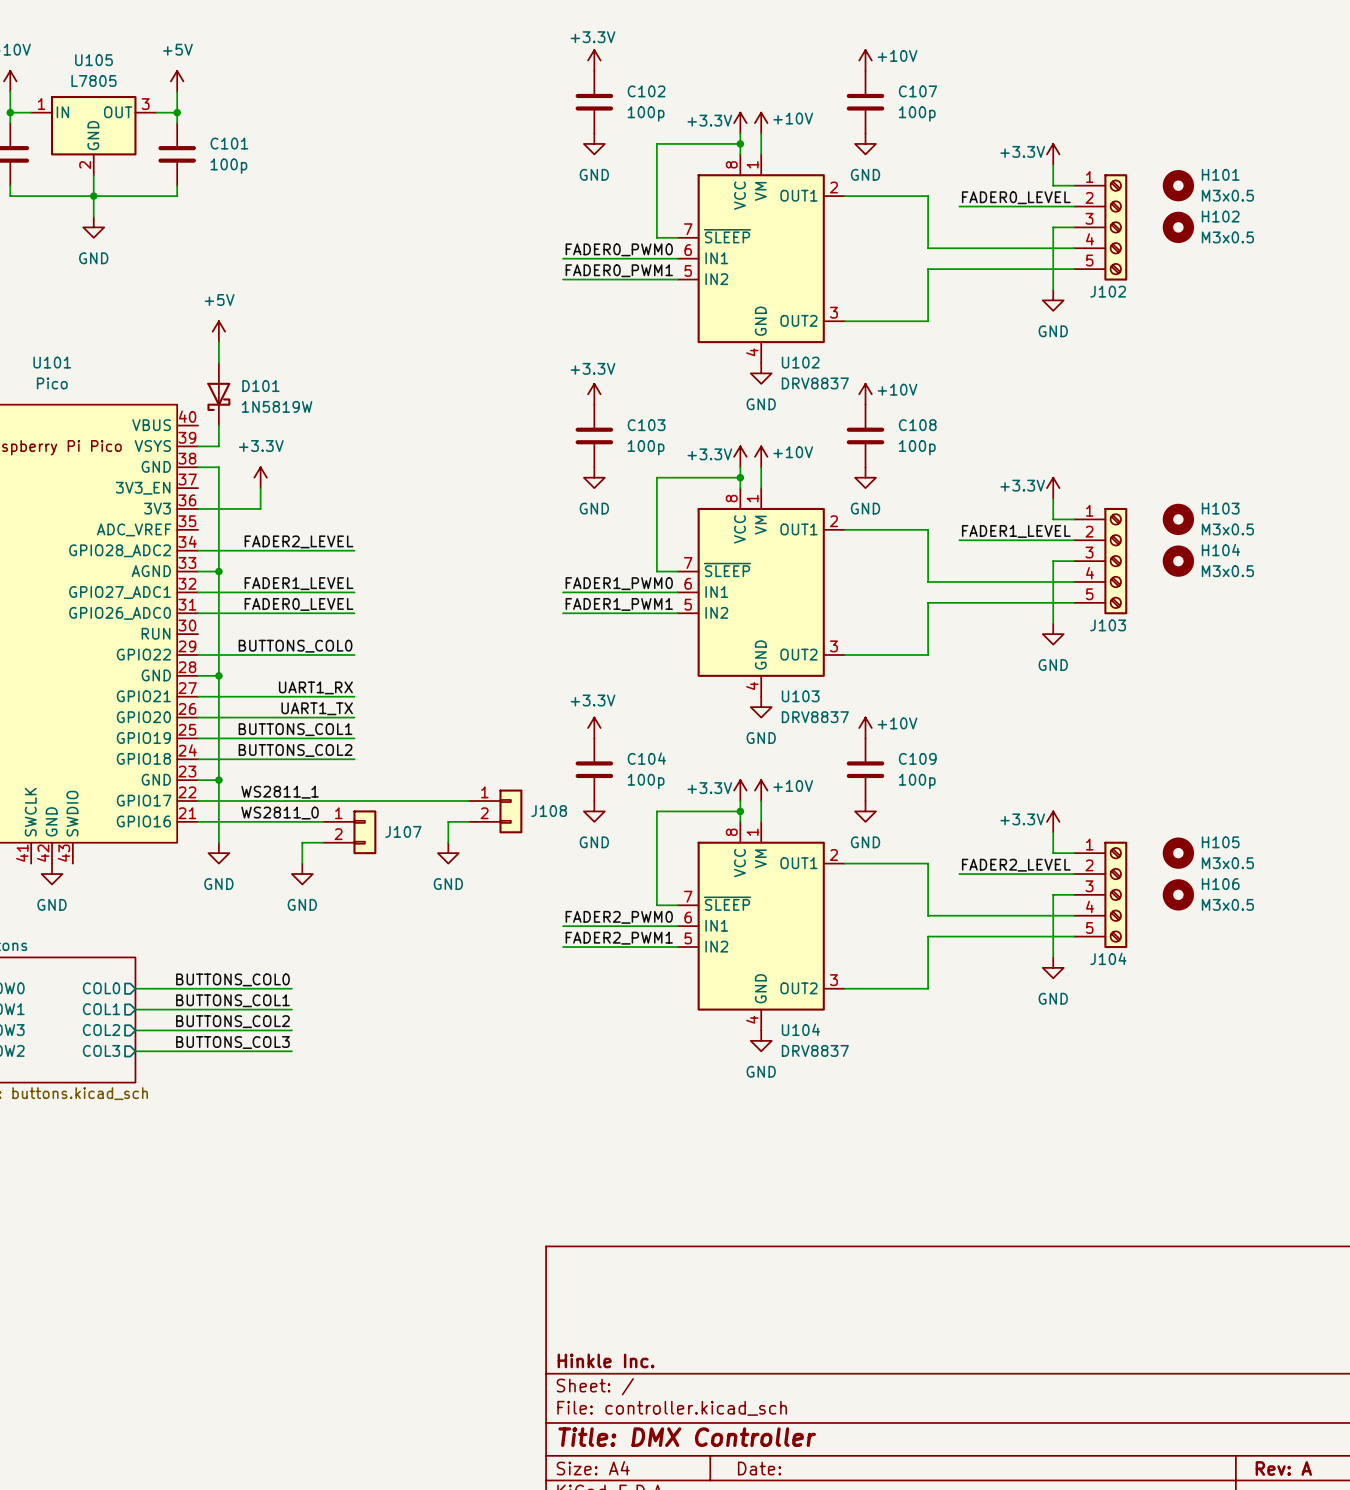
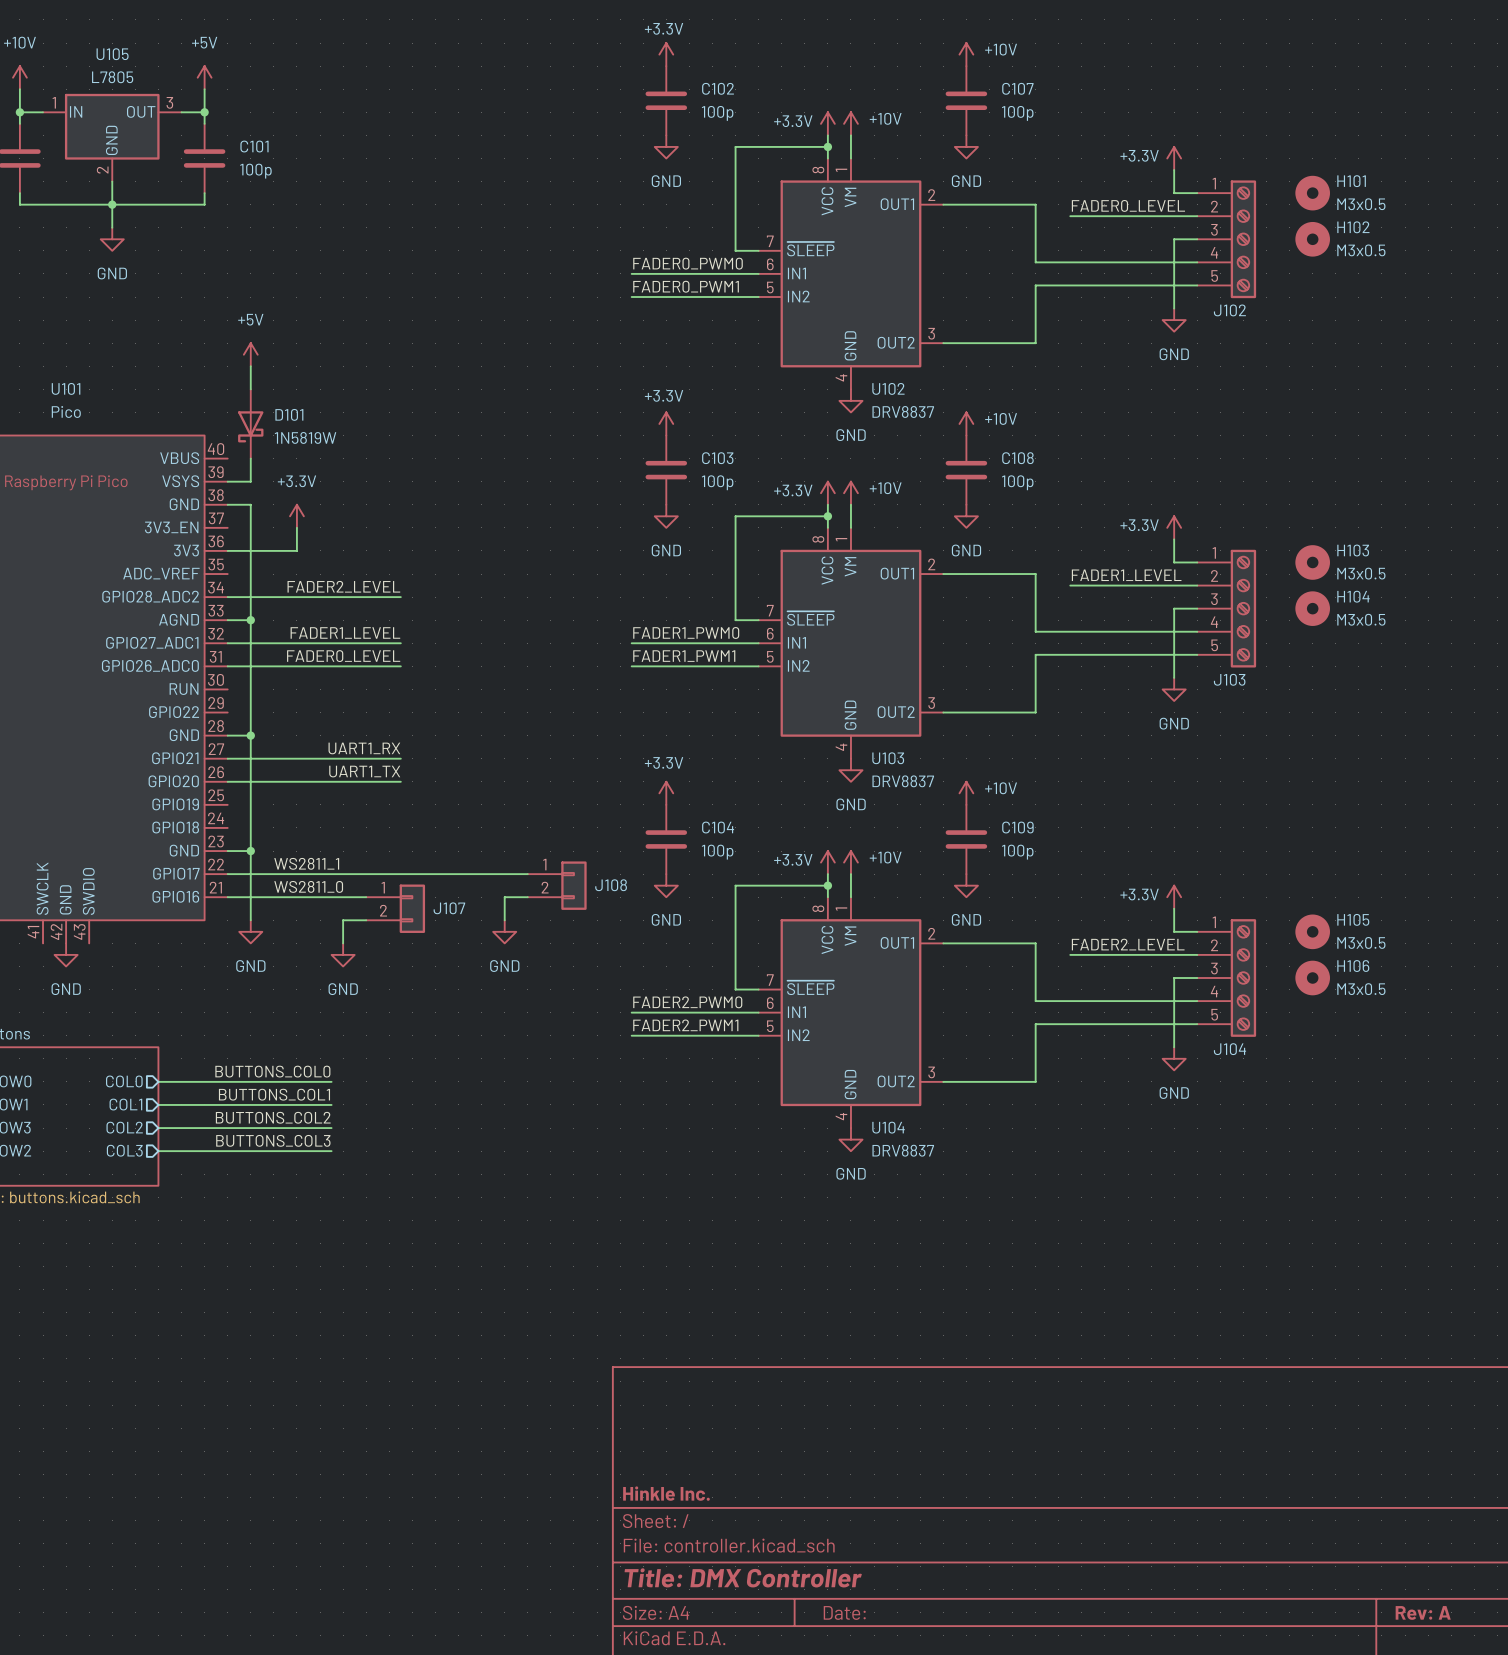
label: BUTTONS_COL0 (295, 646) -> none
wire: (198, 654) (354, 654) -> none
label: BUTTONS_COL1 (295, 729) -> none
wire: (198, 738) (354, 738) -> none
label: BUTTONS_COL2 (295, 750) -> none
wire: (198, 759) (354, 759) -> none

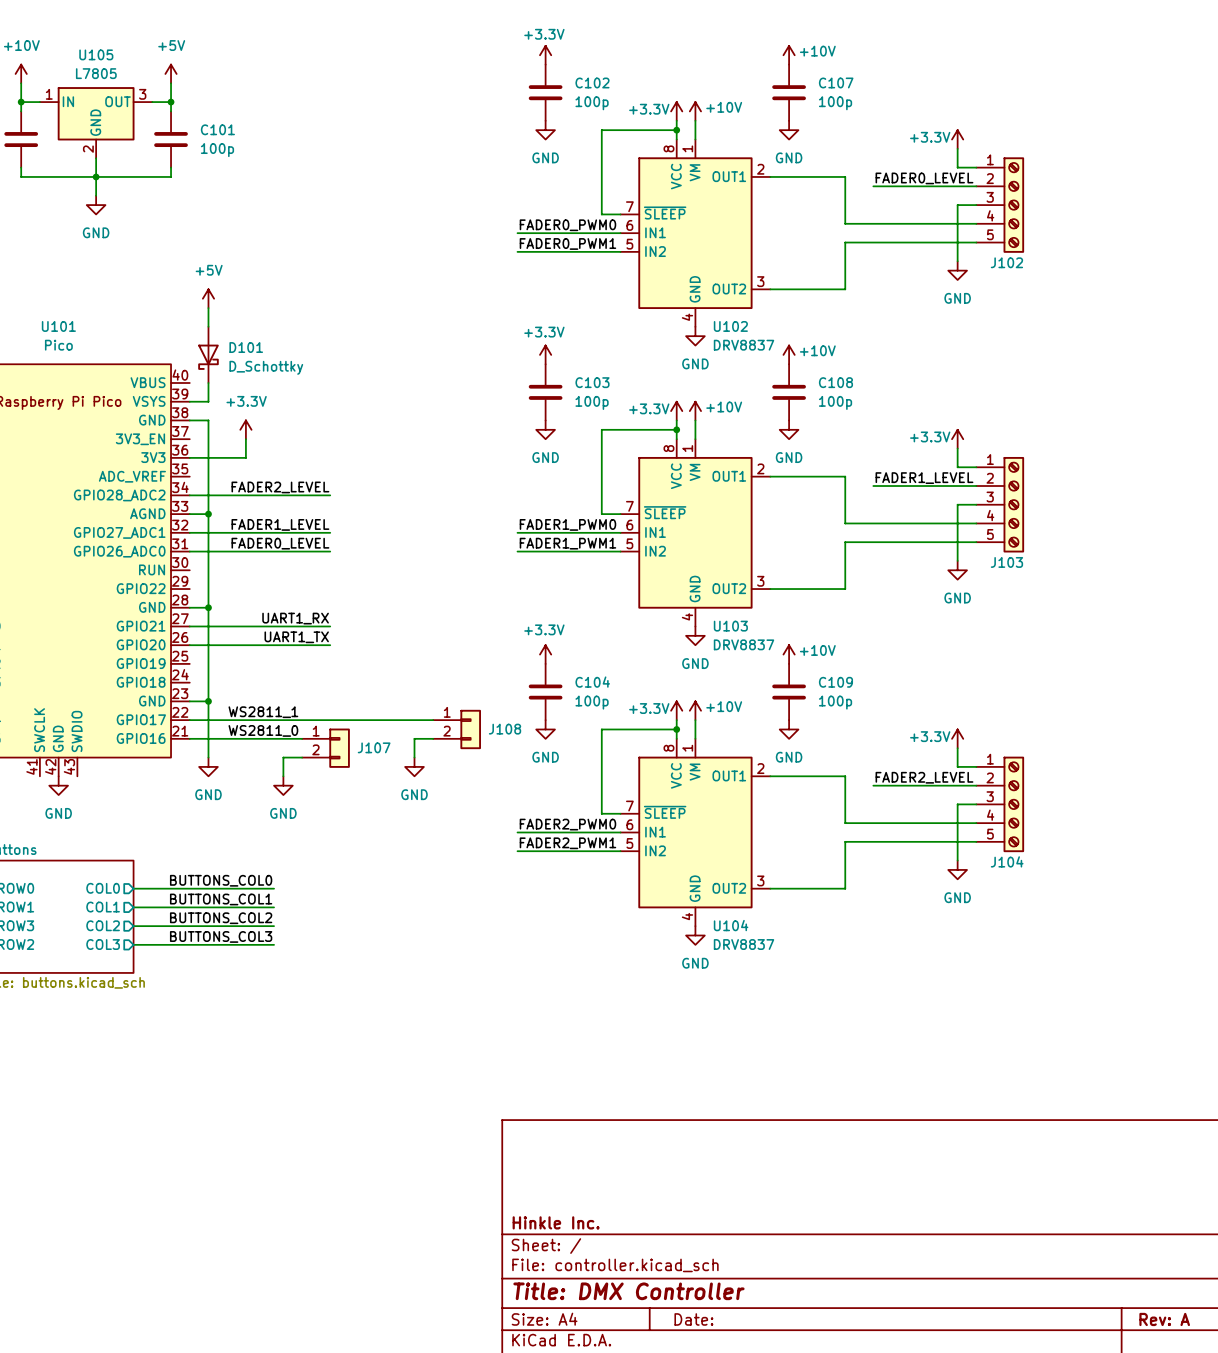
H101: M3x0.5 (1312, 193) -> none
H102: M3x0.5 (1312, 239) -> none
D101 value: 1N5819W (305, 437) -> D_Schottky (266, 367)
H103: M3x0.5 (1312, 562) -> none
H104: M3x0.5 (1312, 608) -> none
H105: M3x0.5 (1312, 931) -> none
H106: M3x0.5 (1312, 978) -> none

